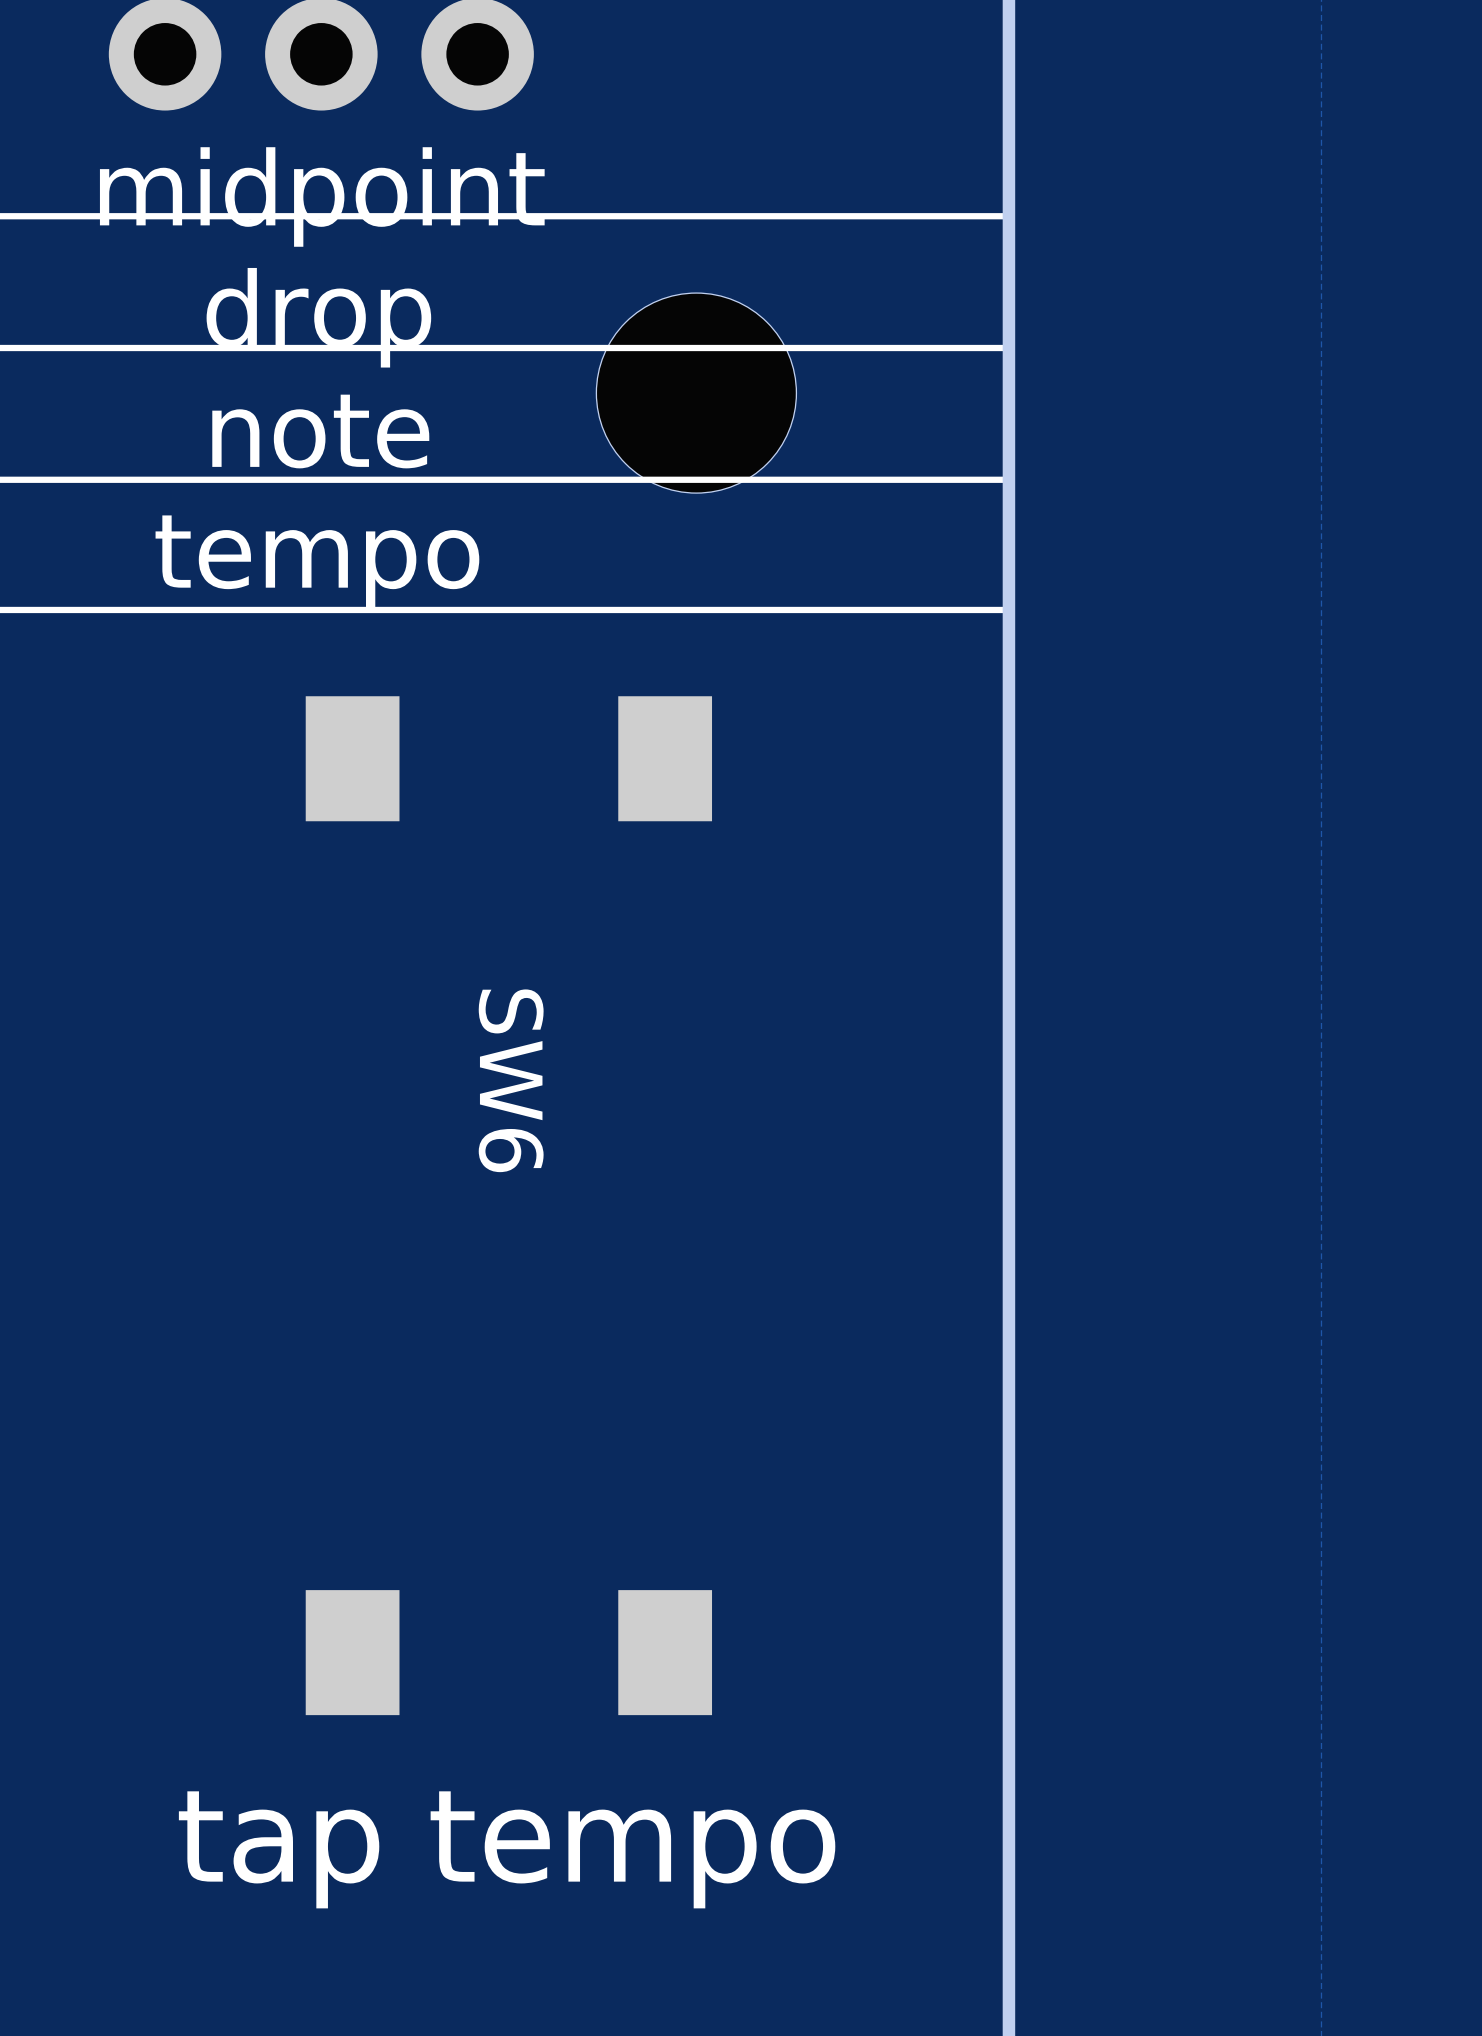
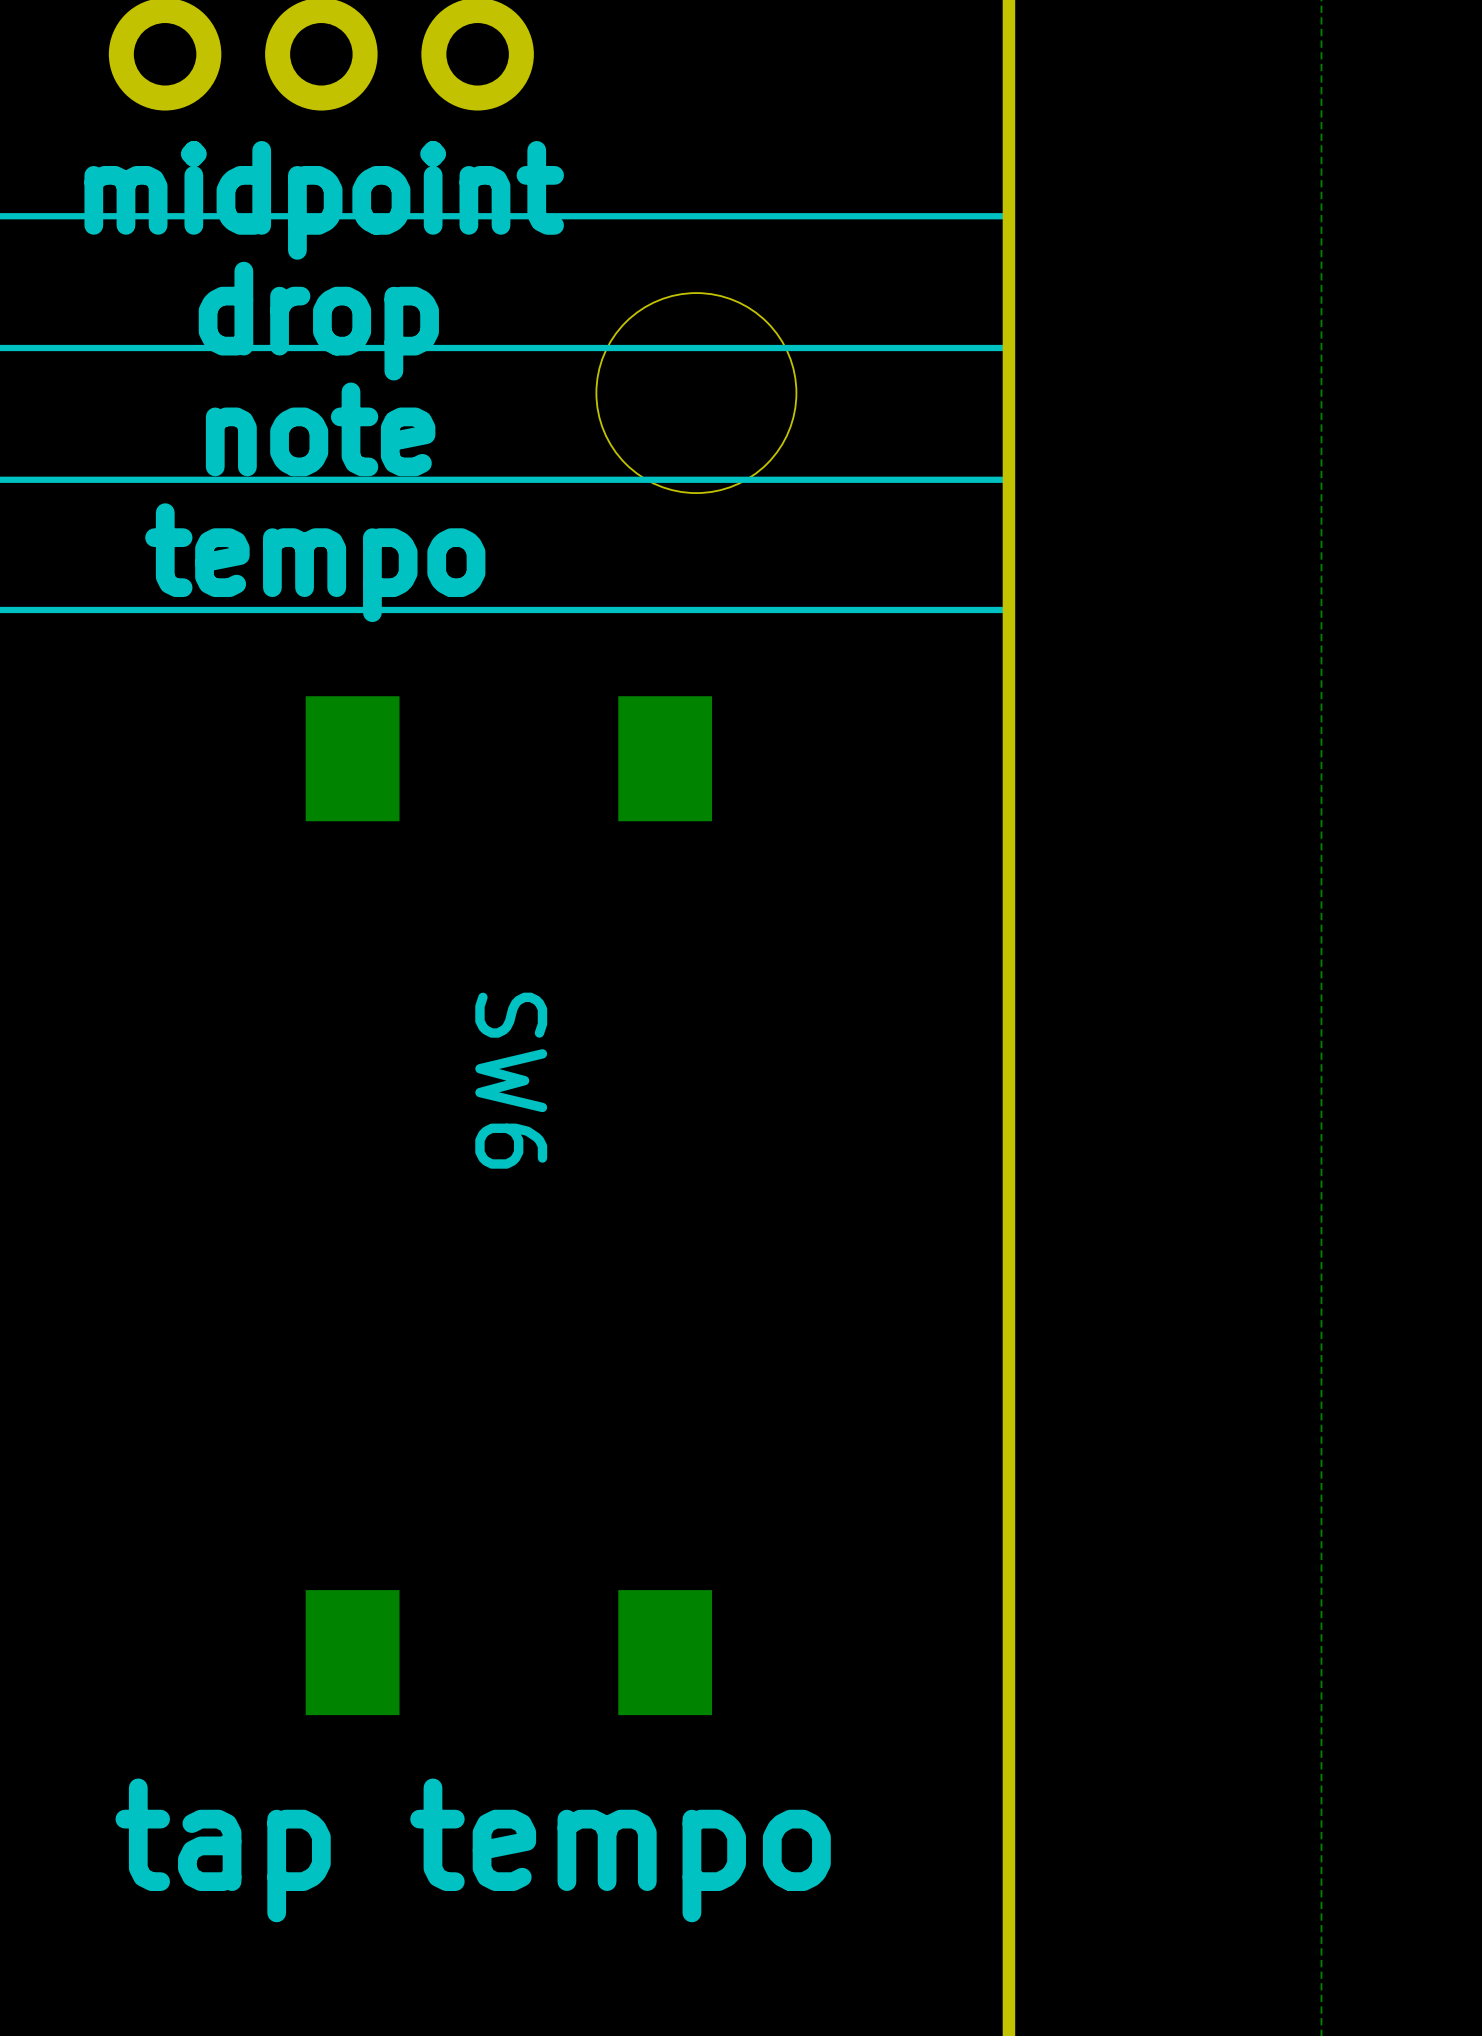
text position: tap tempo (507, 1849) -> tap tempo (473, 1850)

